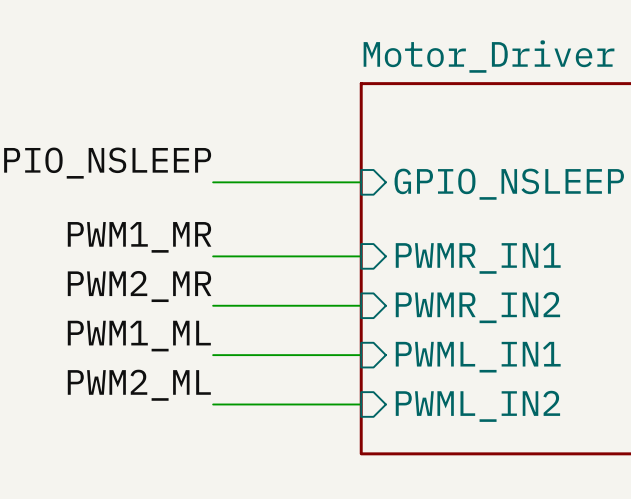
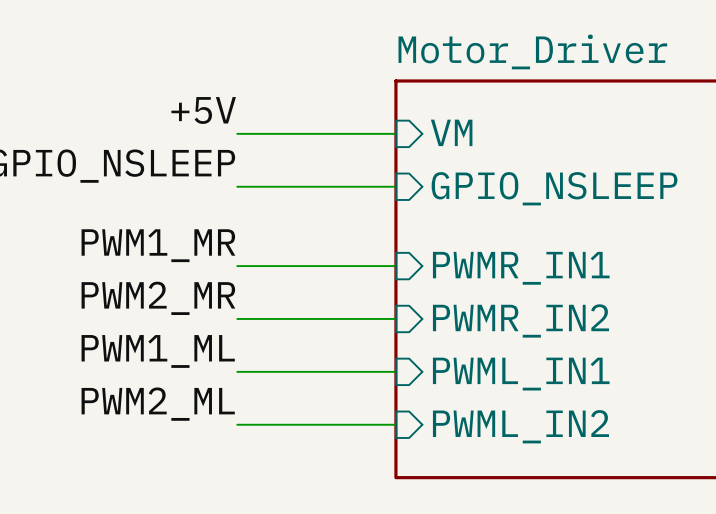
label: none -> +5V (203, 110)
wire: none -> (237, 133) (395, 133)
sheet pin: none -> VM (451, 132)

